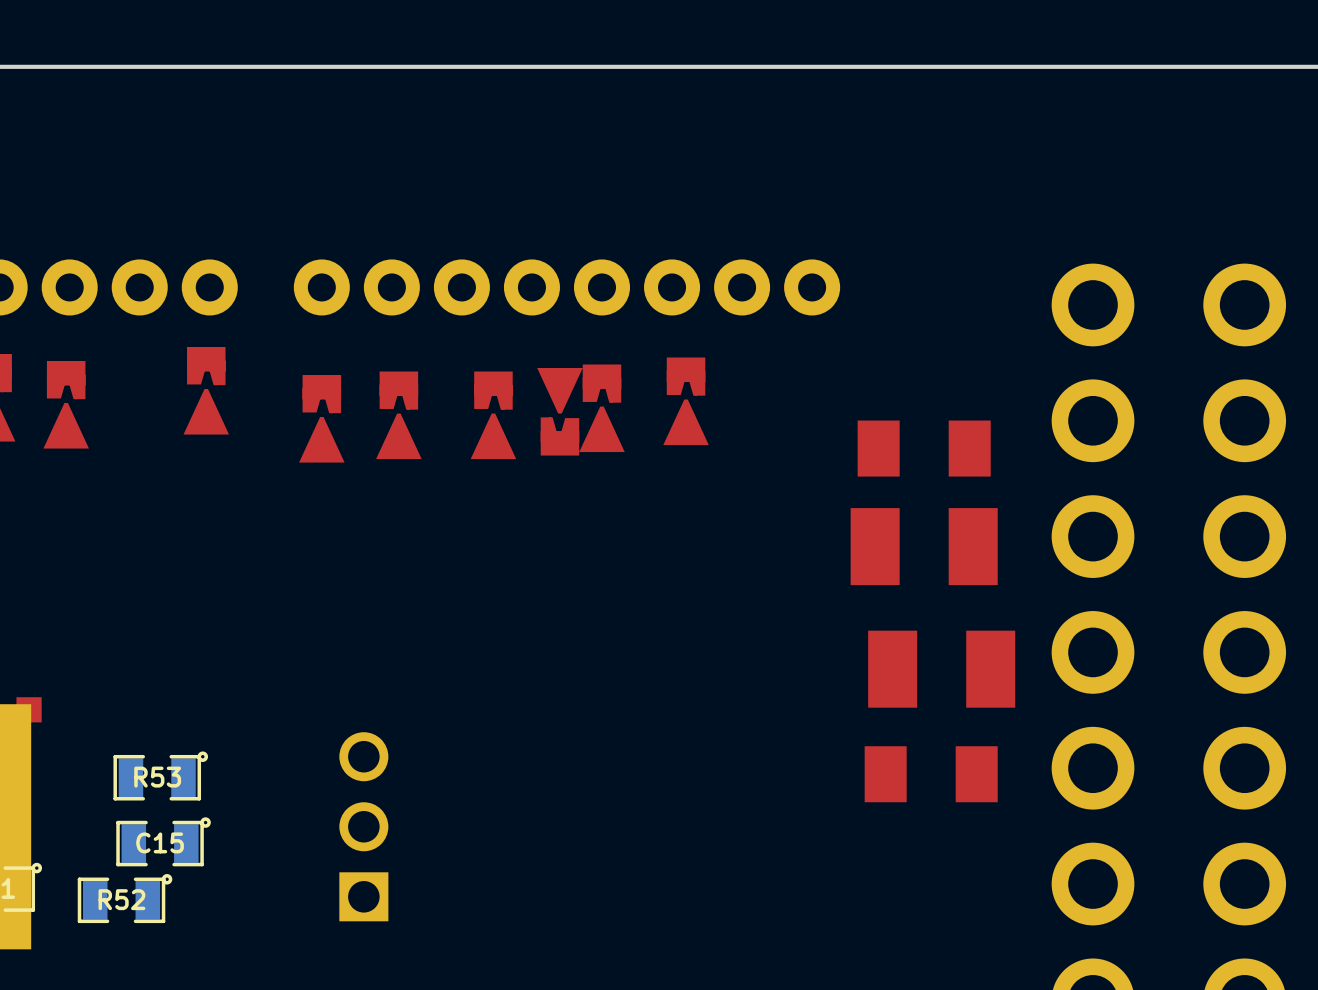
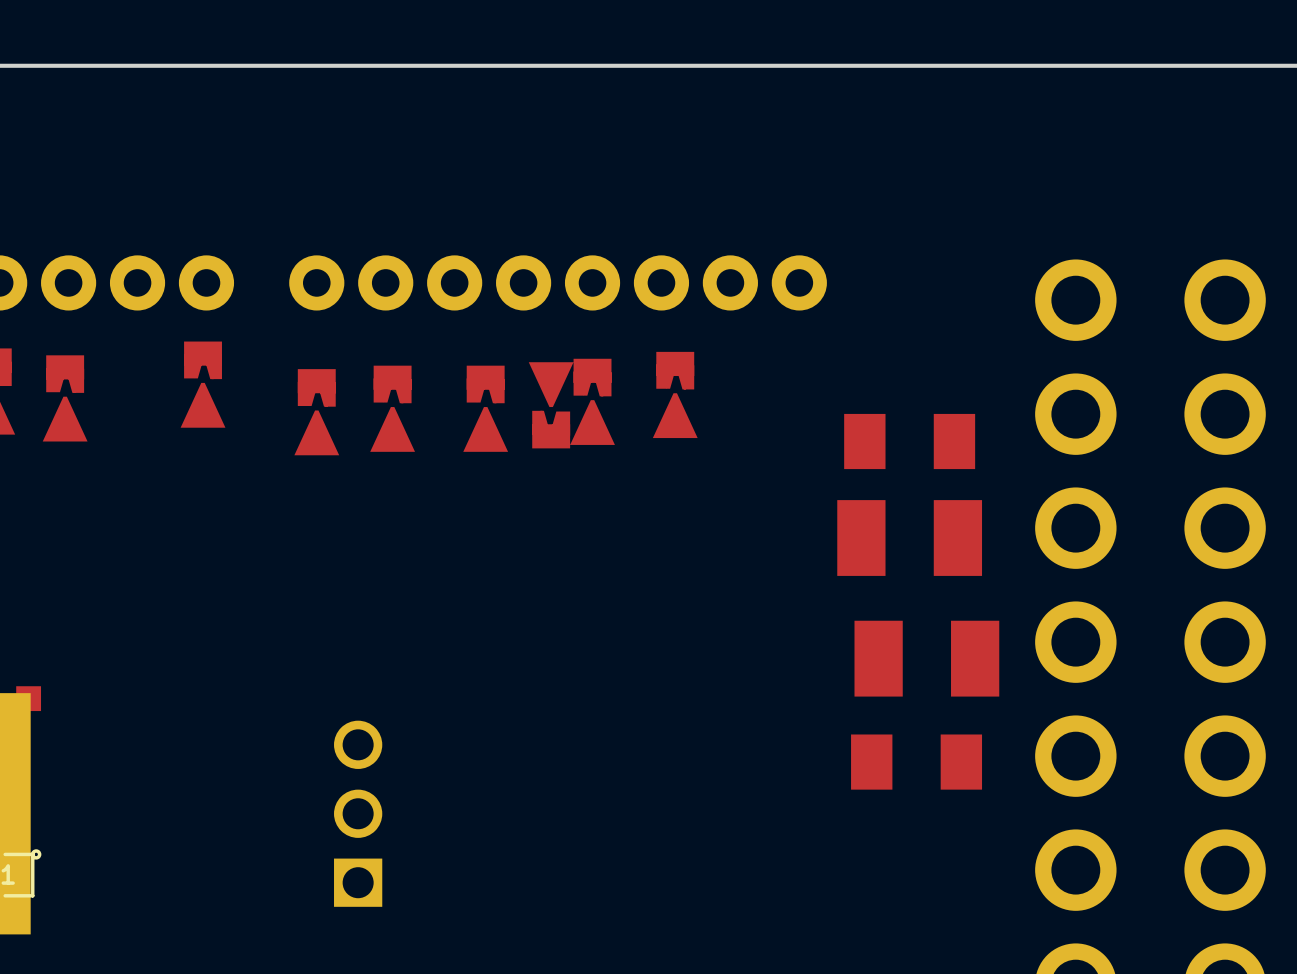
R53: (160, 775) -> none
C15: (163, 841) -> none
R52: (125, 898) -> none

